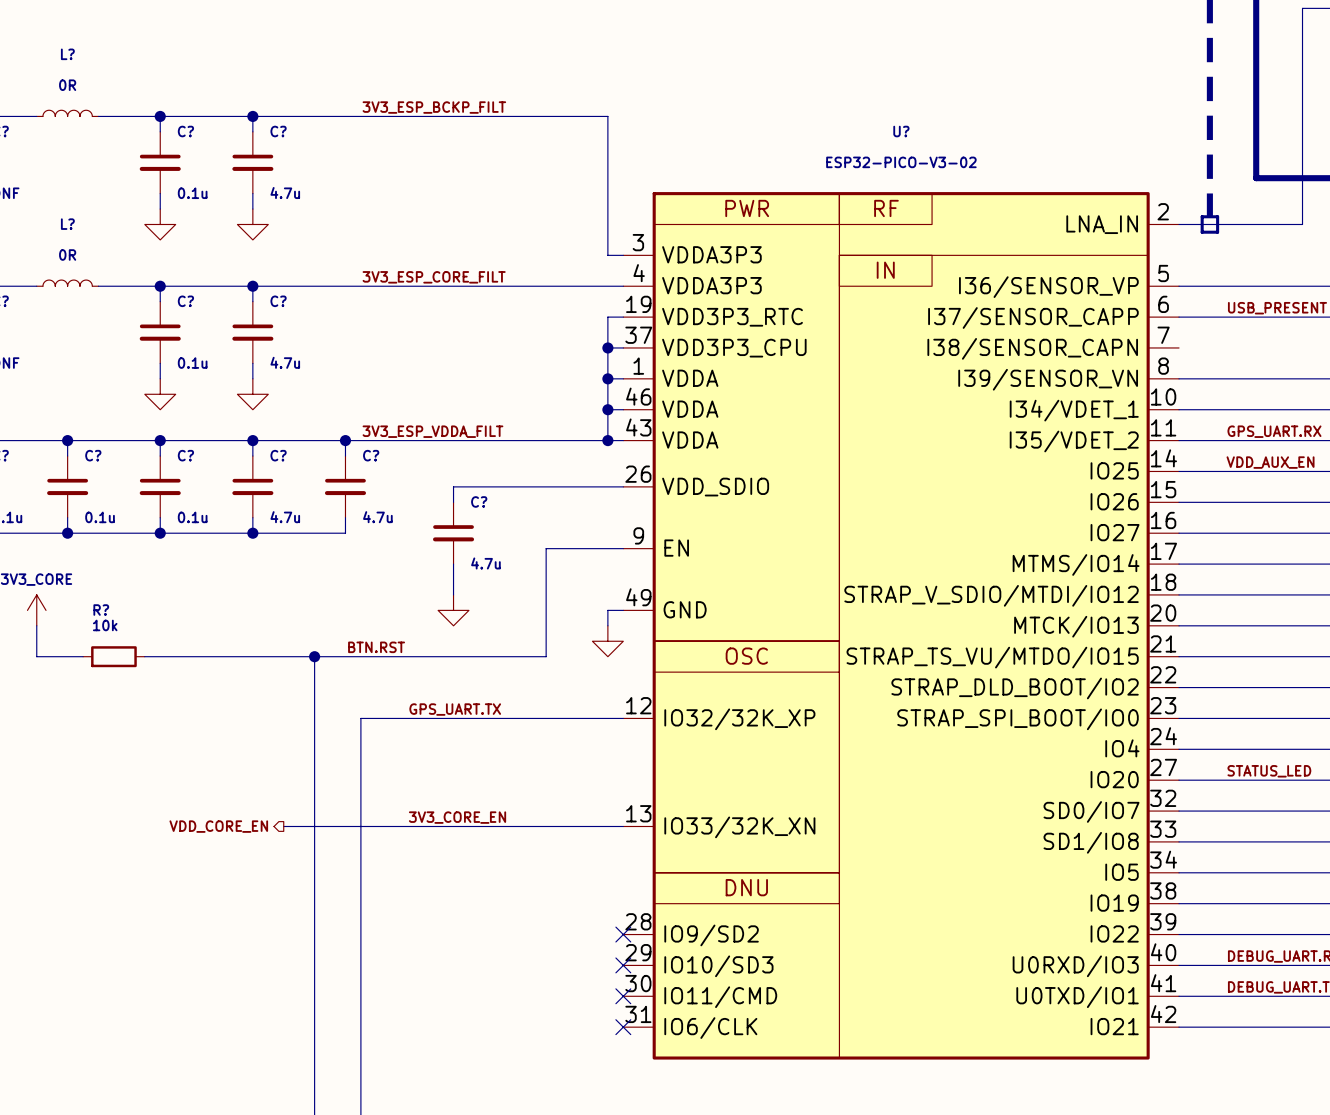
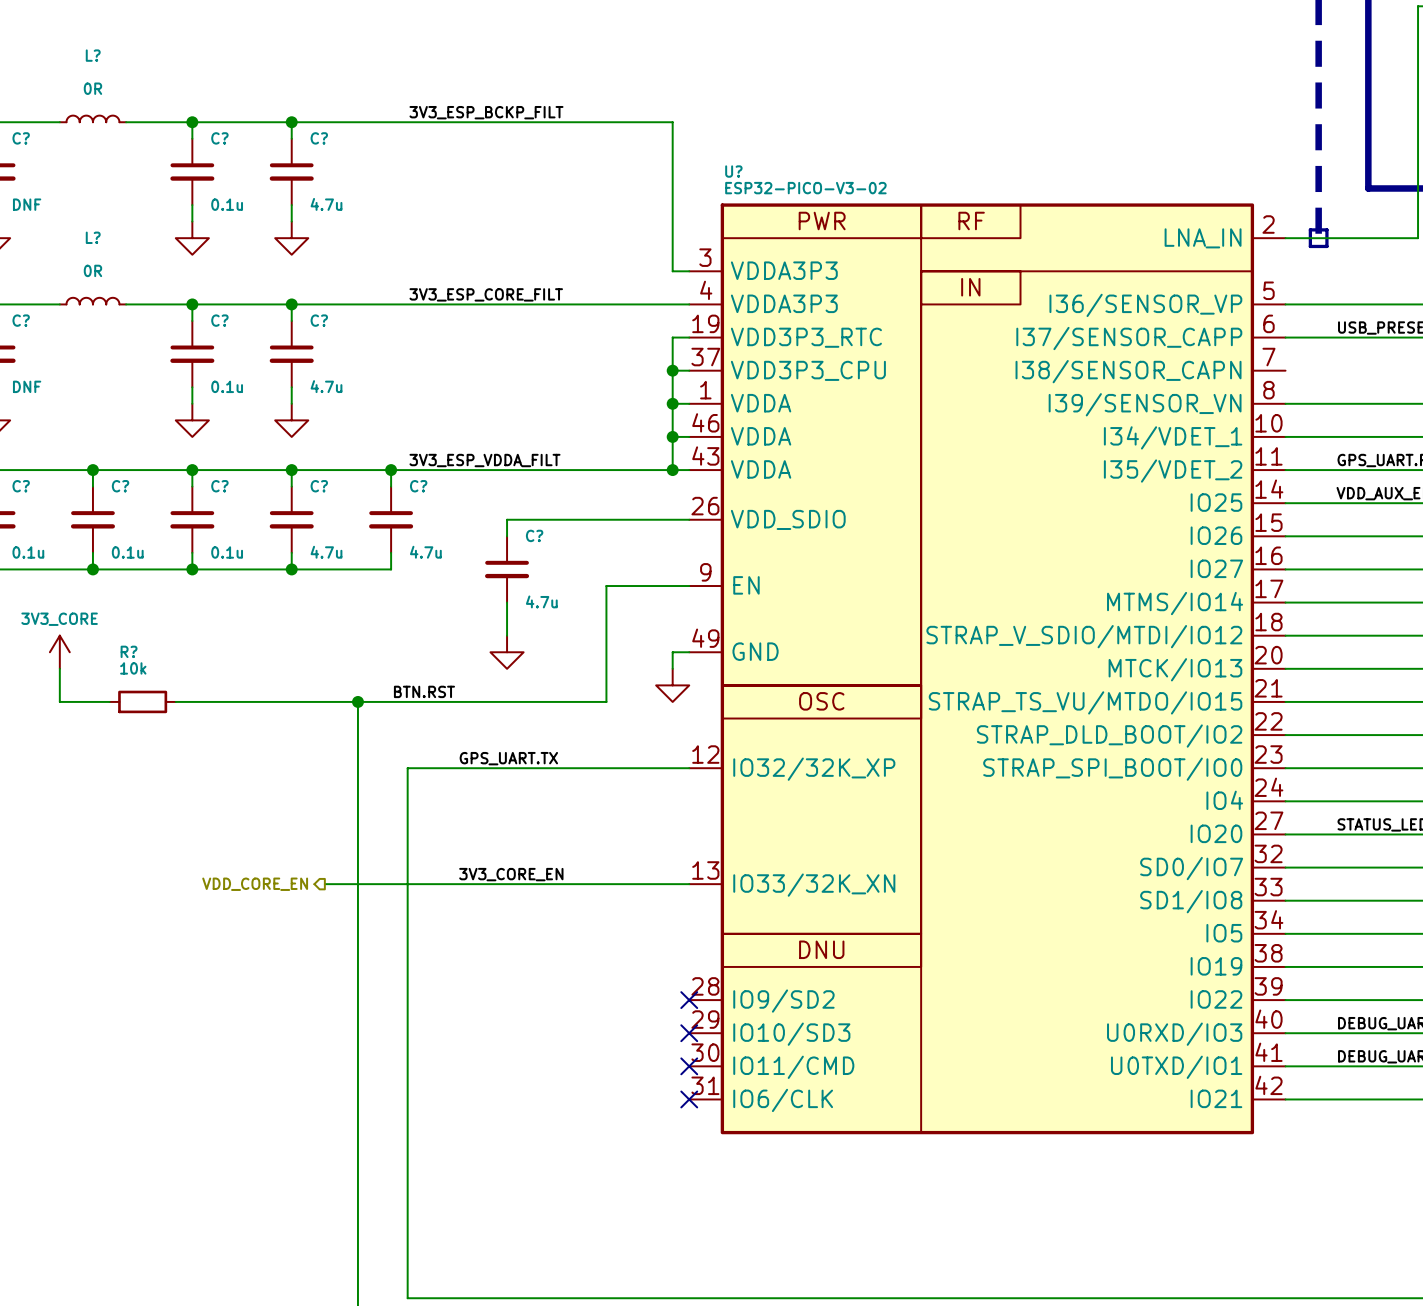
U? name position: U? (901, 131) -> U? (733, 171)
U? value position: ESP32-PICO-V3-02 (901, 162) -> ESP32-PICO-V3-02 (805, 188)

